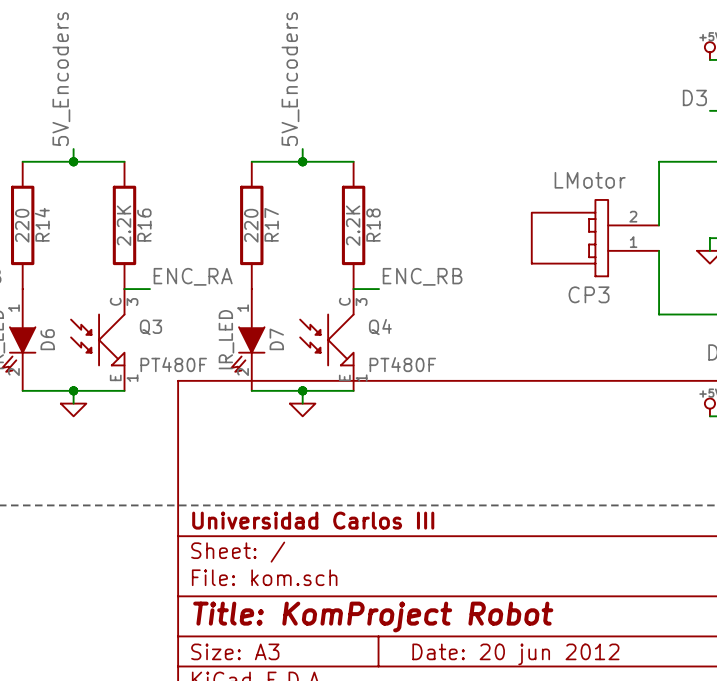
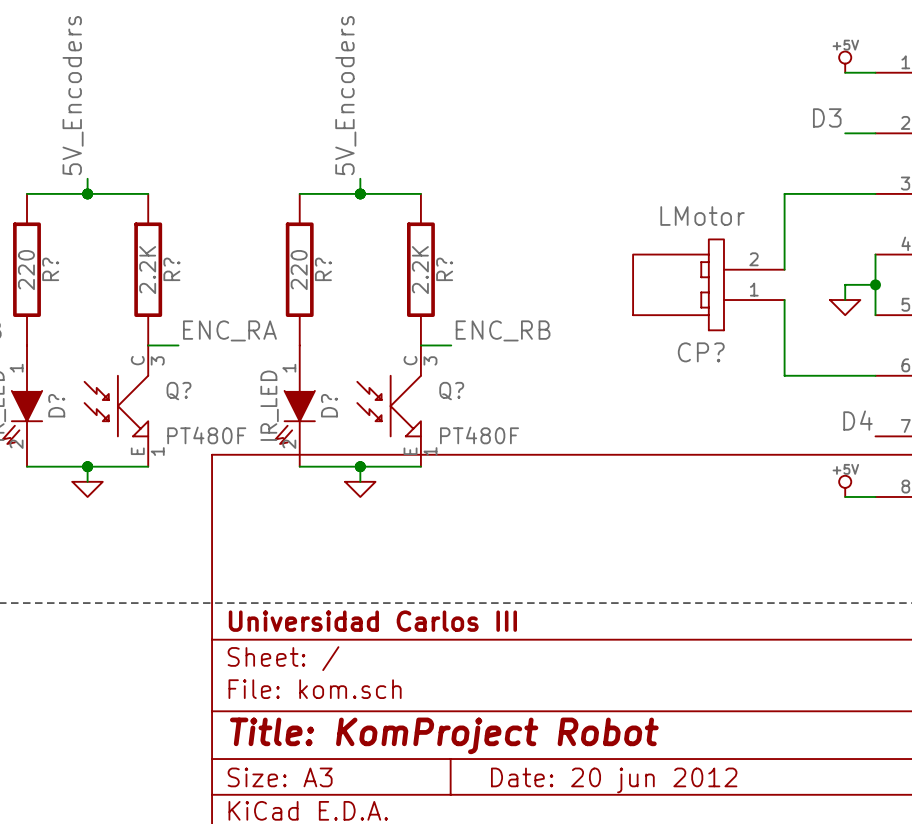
R14 name: R14 (42, 224) -> R? (50, 269)
R17 name: R17 (271, 224) -> R? (323, 269)
R16 name: R16 (144, 225) -> R? (171, 269)
R18 name: R18 (373, 225) -> R? (444, 269)
CP3 name: CP3 (589, 294) -> CP? (701, 352)
Q3 name: Q3 (150, 327) -> Q? (178, 391)
Q4 name: Q4 (380, 327) -> Q? (451, 391)
D6 name: D6 (47, 339) -> D? (56, 405)
D7 name: D7 (276, 339) -> D? (329, 405)

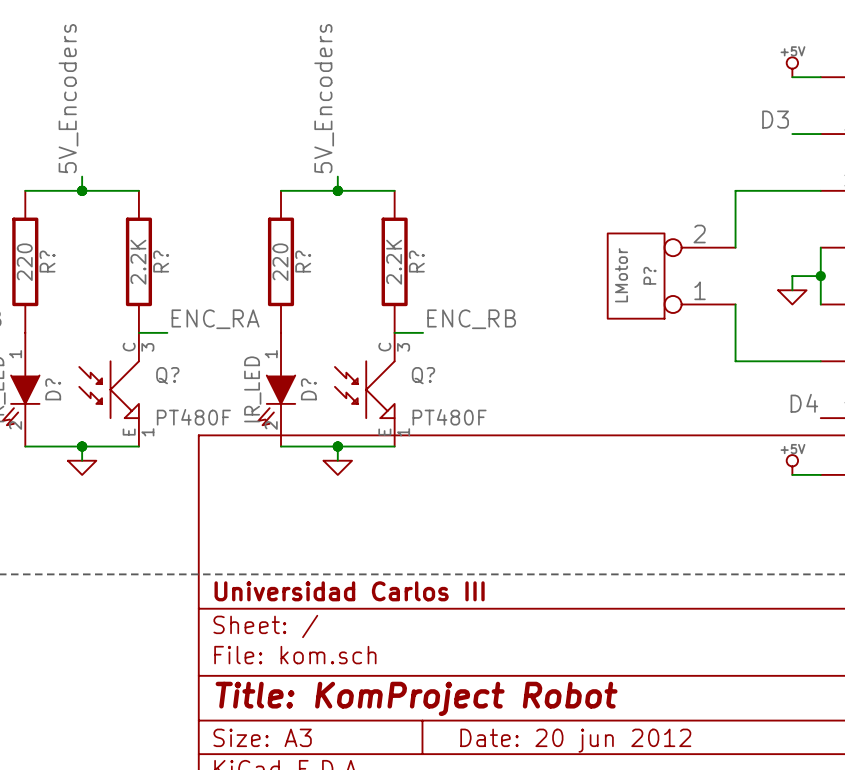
wire: (784, 254) (784, 269) -> none
CP?: LMotor (708, 284) -> none
P?: none -> LMotor (671, 276)
wire: (784, 300) (784, 315) -> none

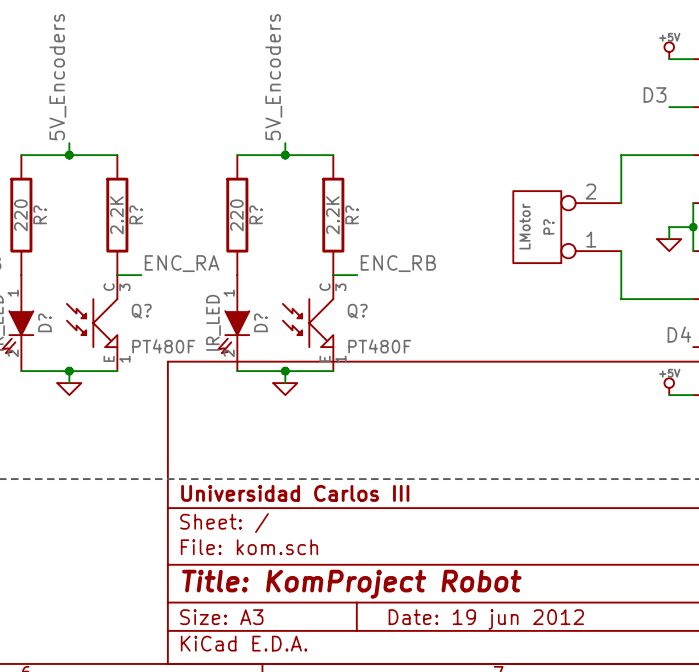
title block: Date: 20 jun 2012 (575, 740) -> Date: 19 jun 2012 (486, 619)

